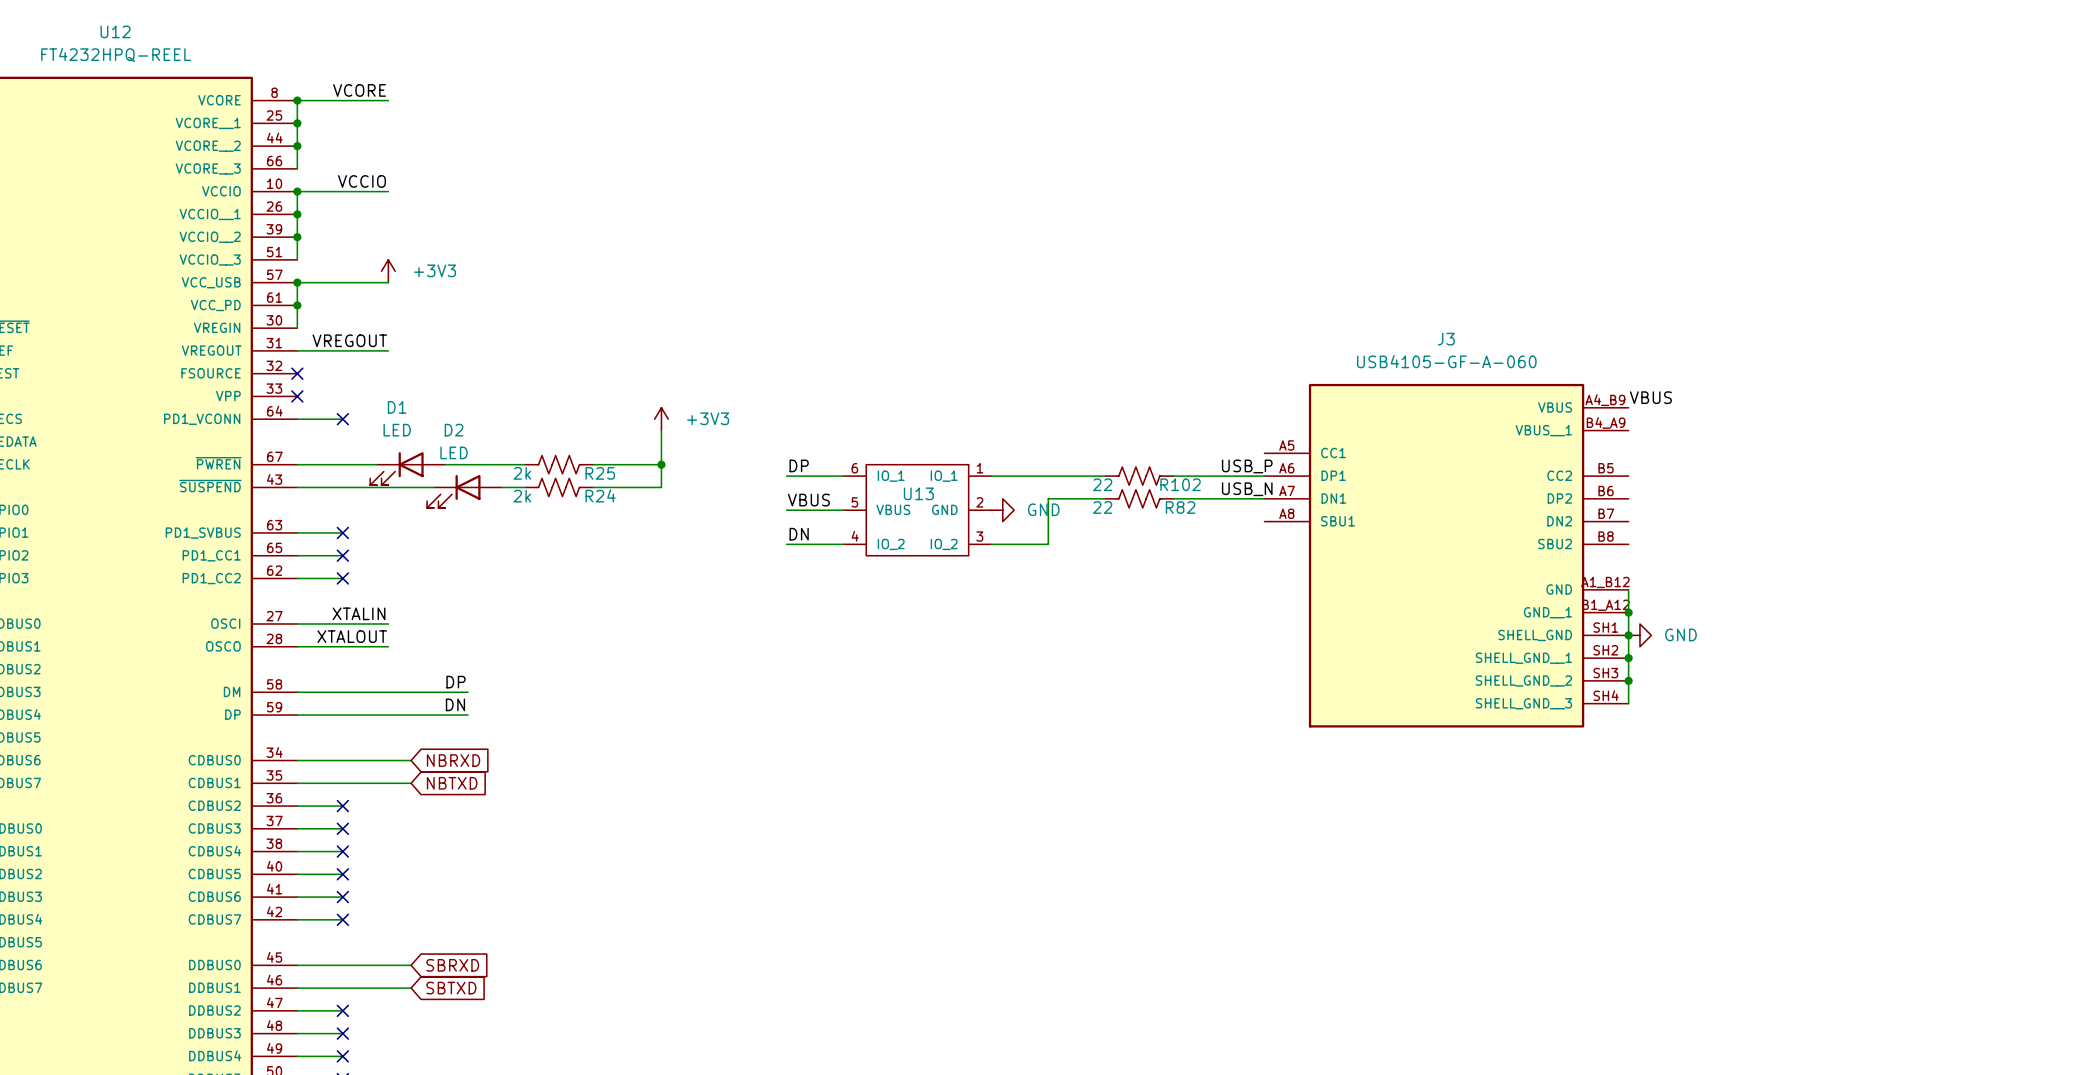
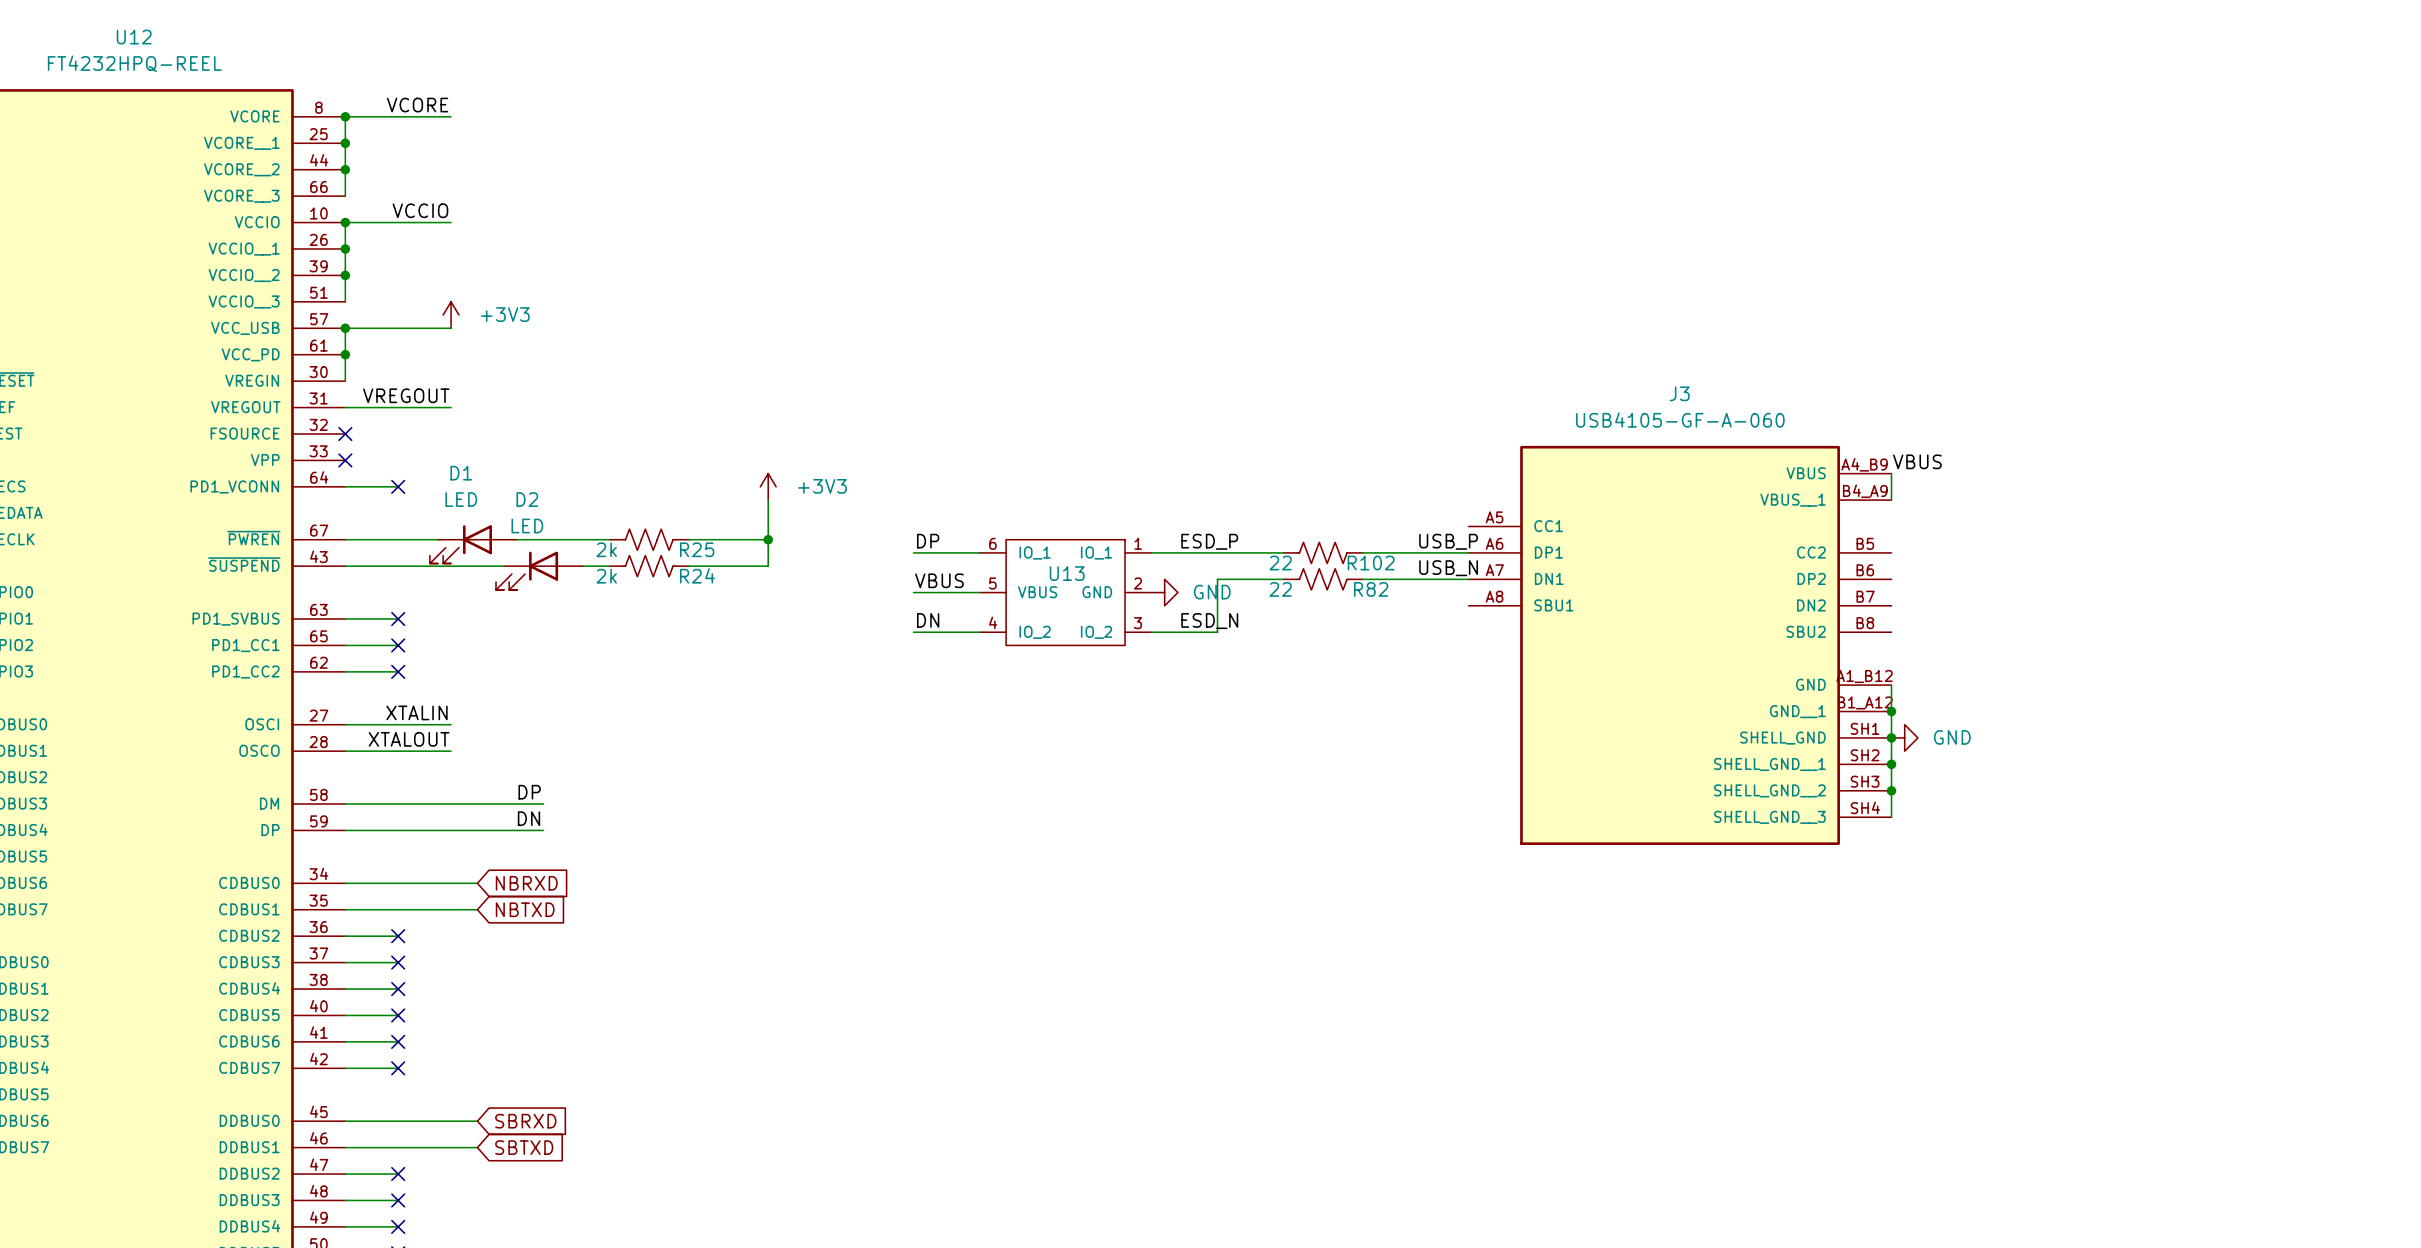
wire: none -> (1891, 473) (1891, 500)
label: none -> ESD_P (1209, 541)
label: none -> ESD_N (1209, 621)

